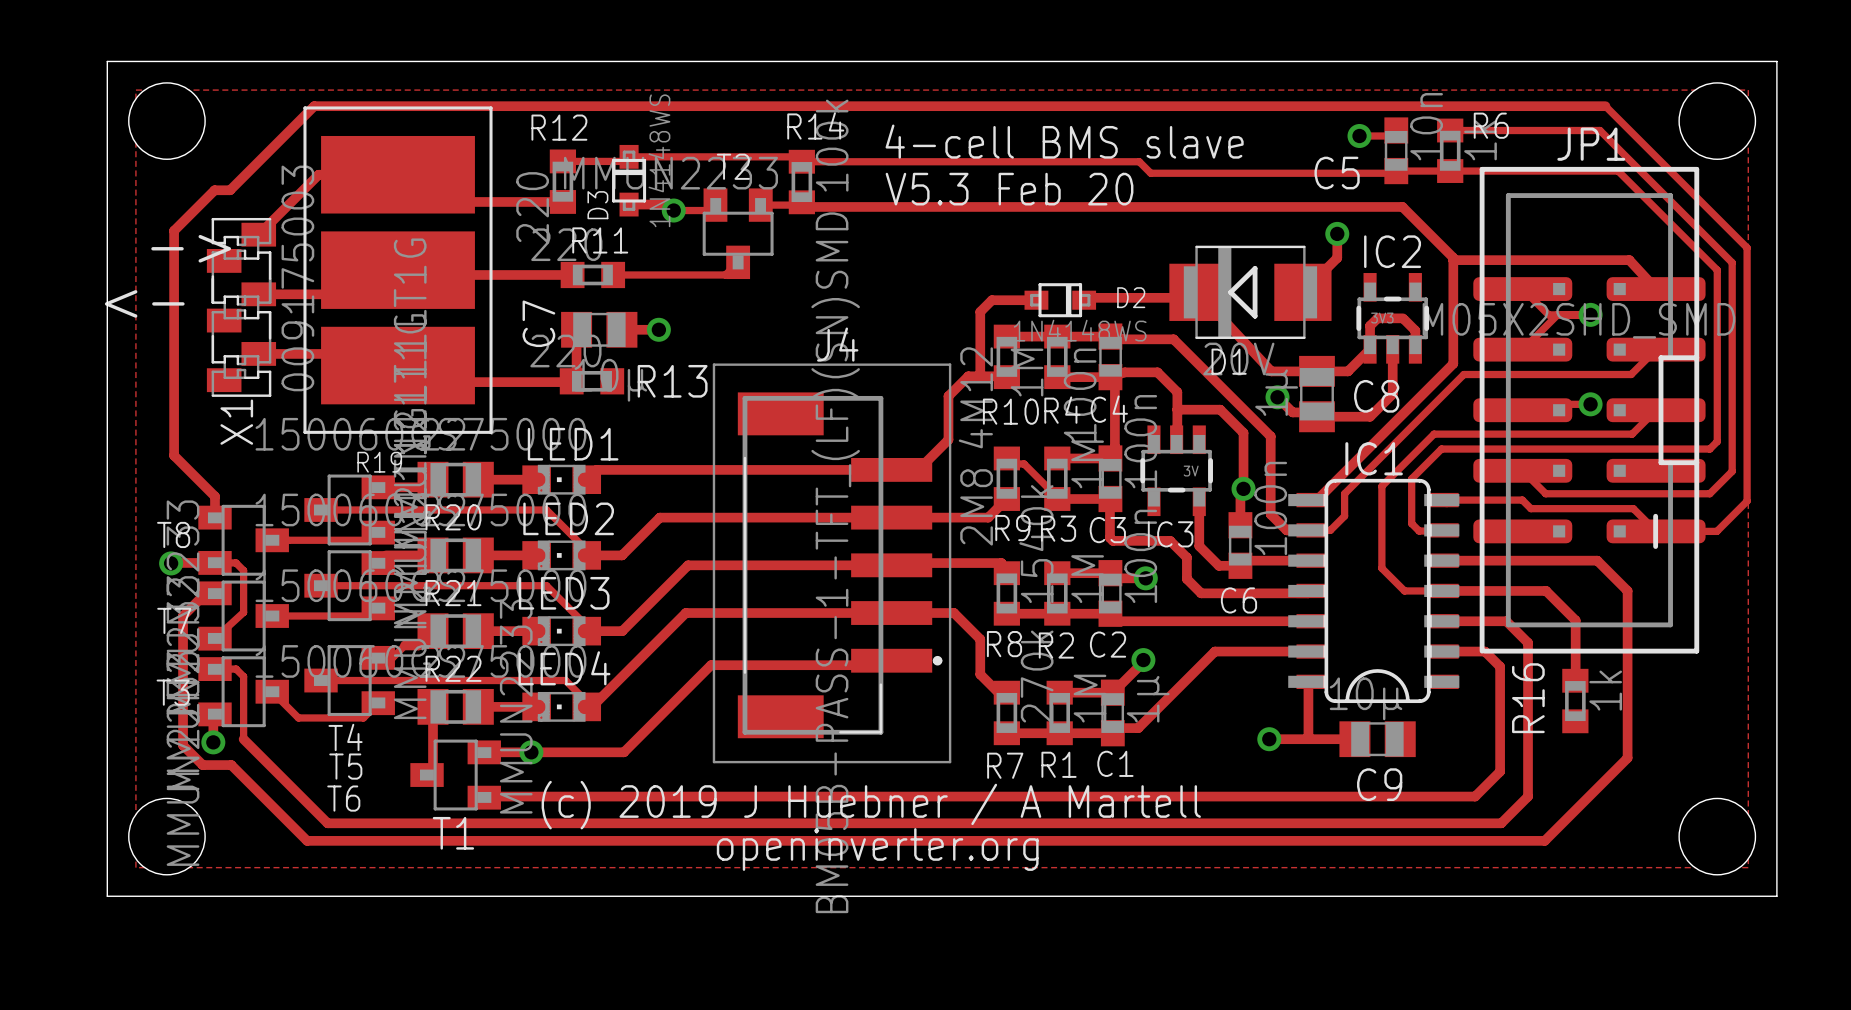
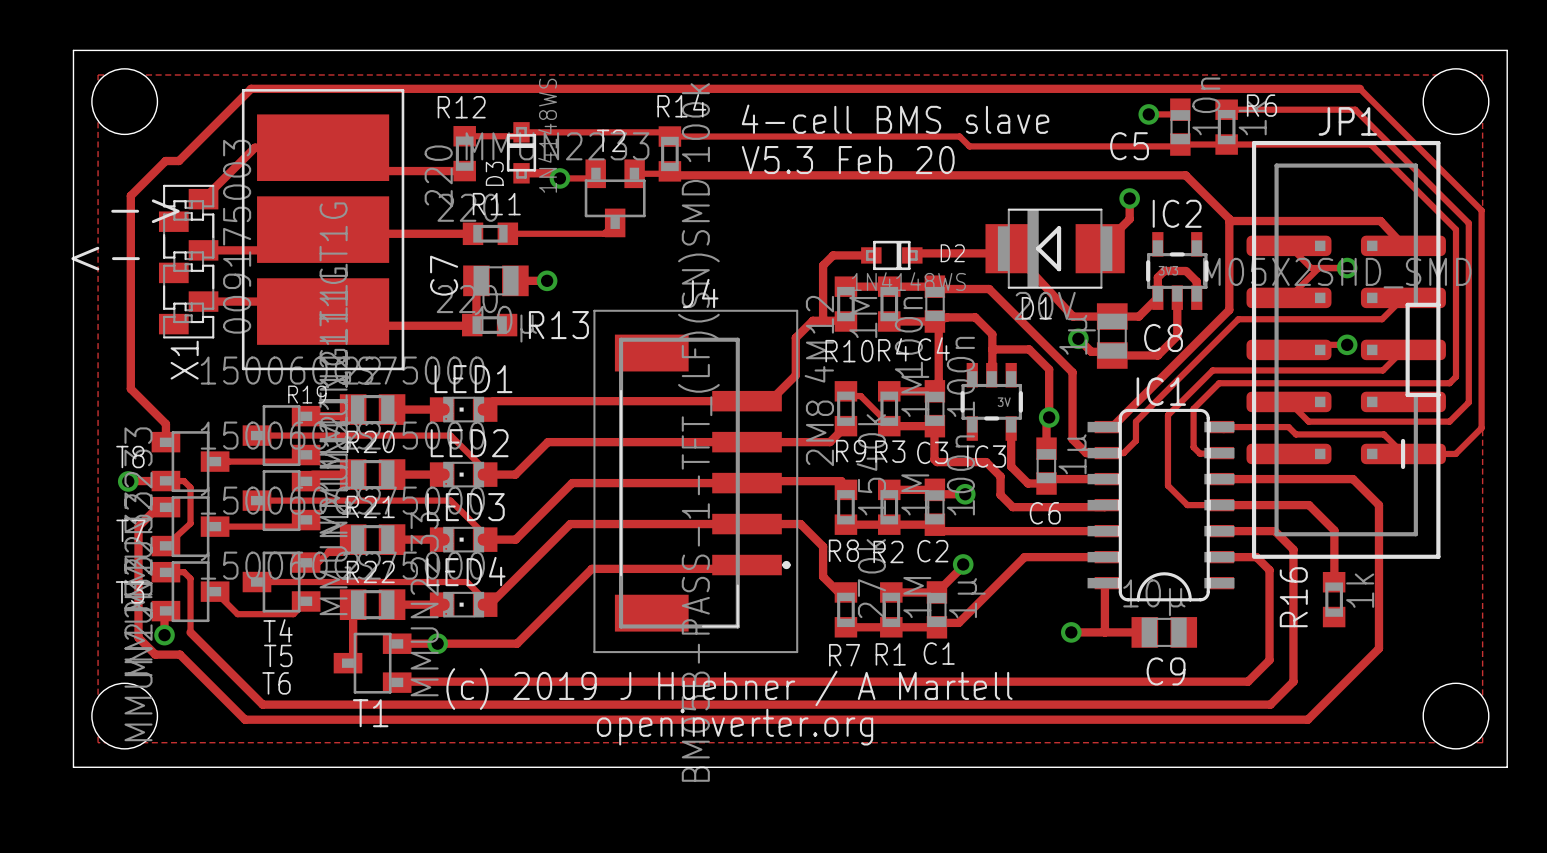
C6 value: 100n (1270, 508) -> 1µ (1076, 454)

